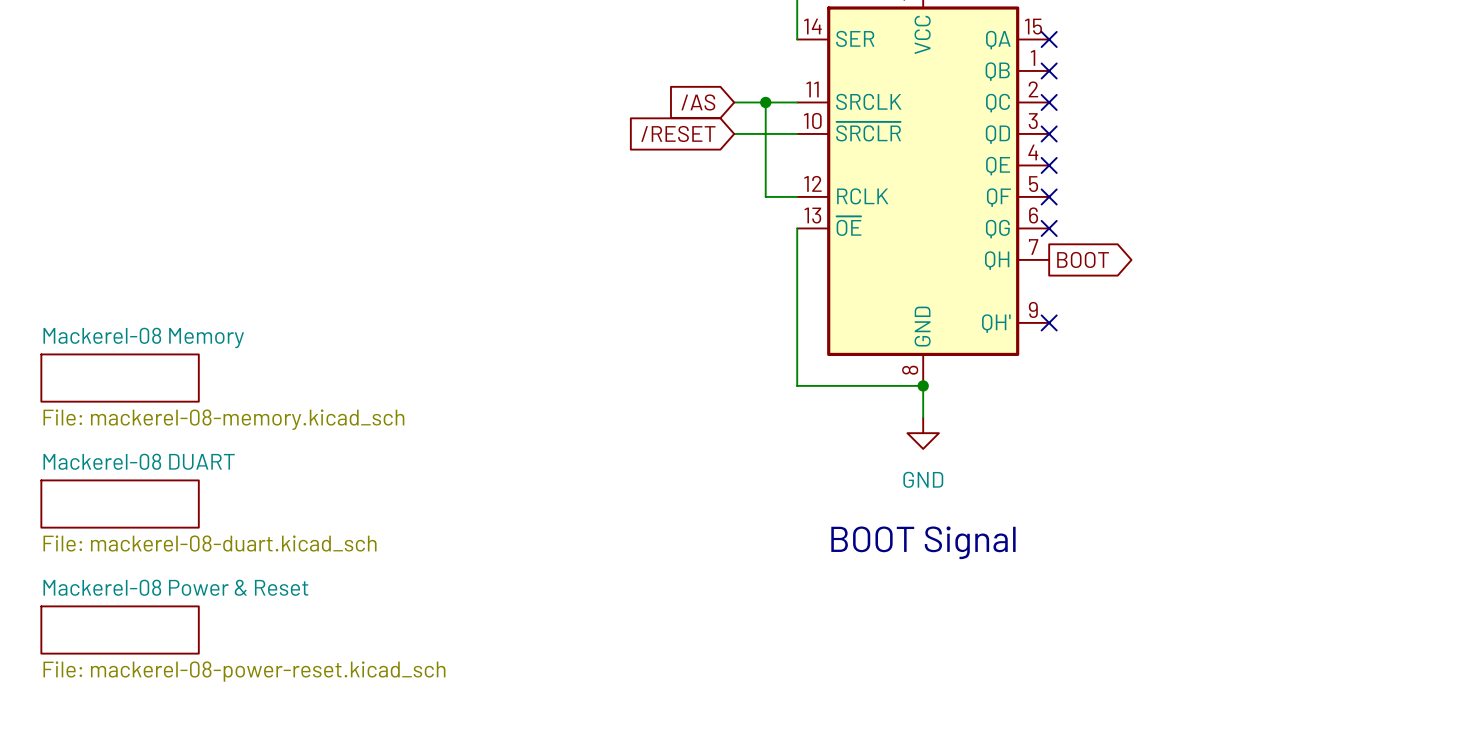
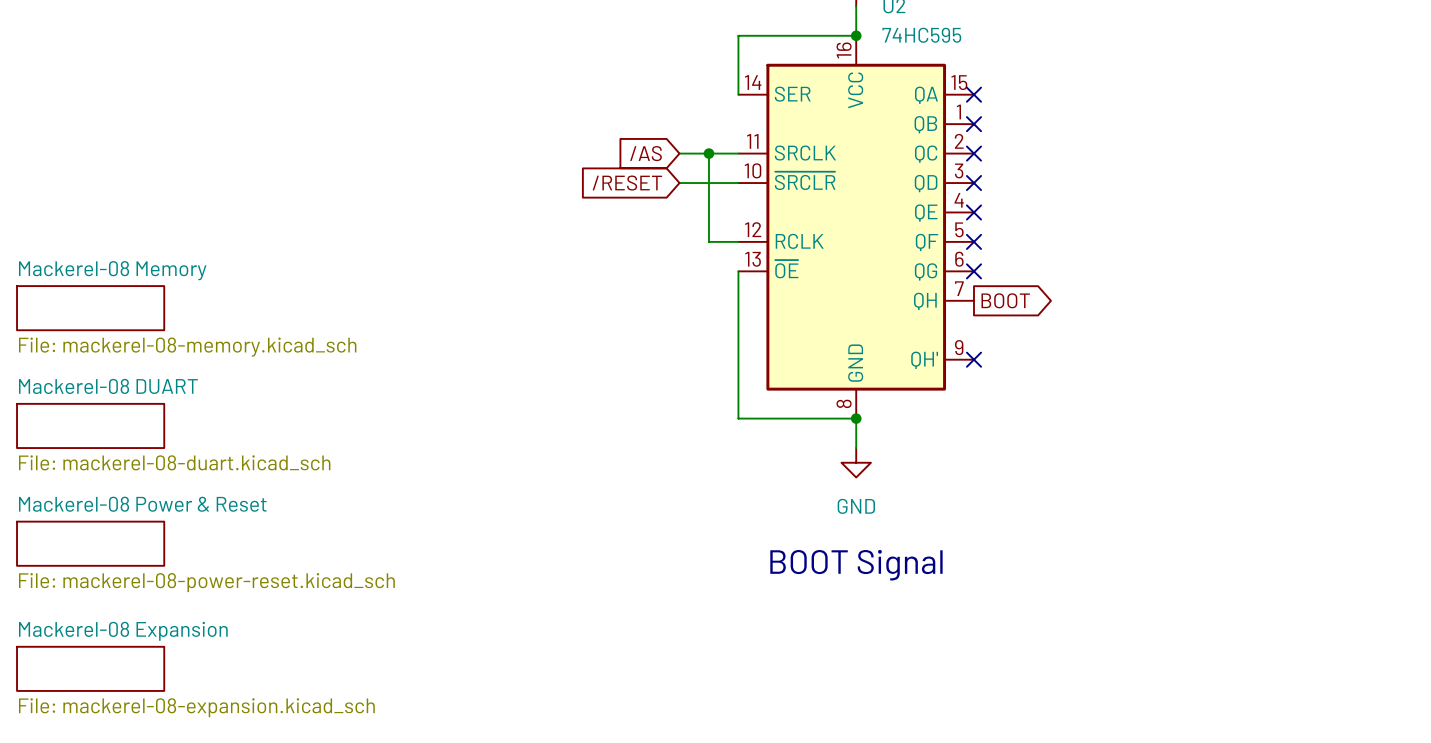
sheet Mackerel-08 Memory position: (120, 378) -> (90, 308)
sheet Mackerel-08 DUART position: (120, 504) -> (90, 425)
sheet Mackerel-08 Power & Reset position: (120, 630) -> (90, 543)
sheet Mackerel-08 Expansion: none -> File: mackerel-08-expansion.kicad_sch (90, 668)

